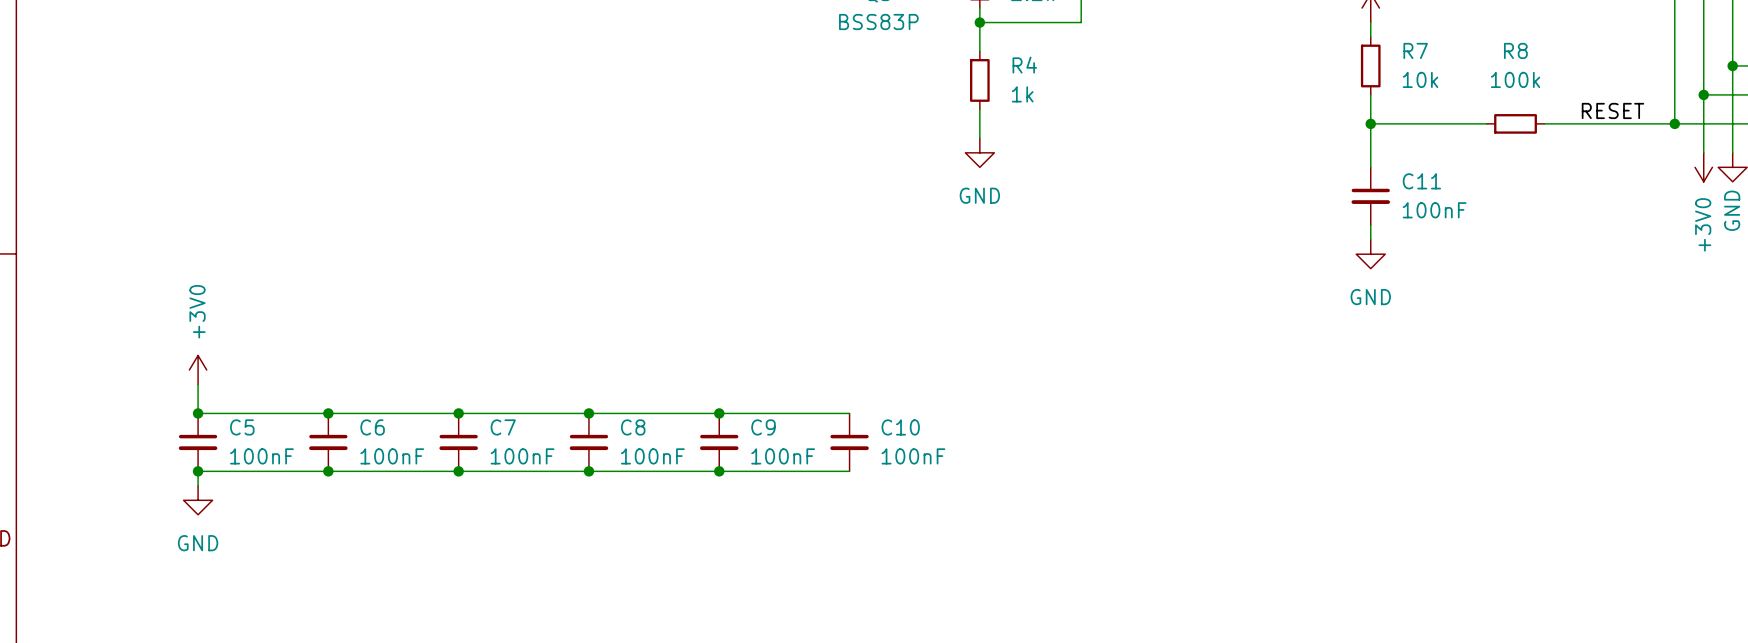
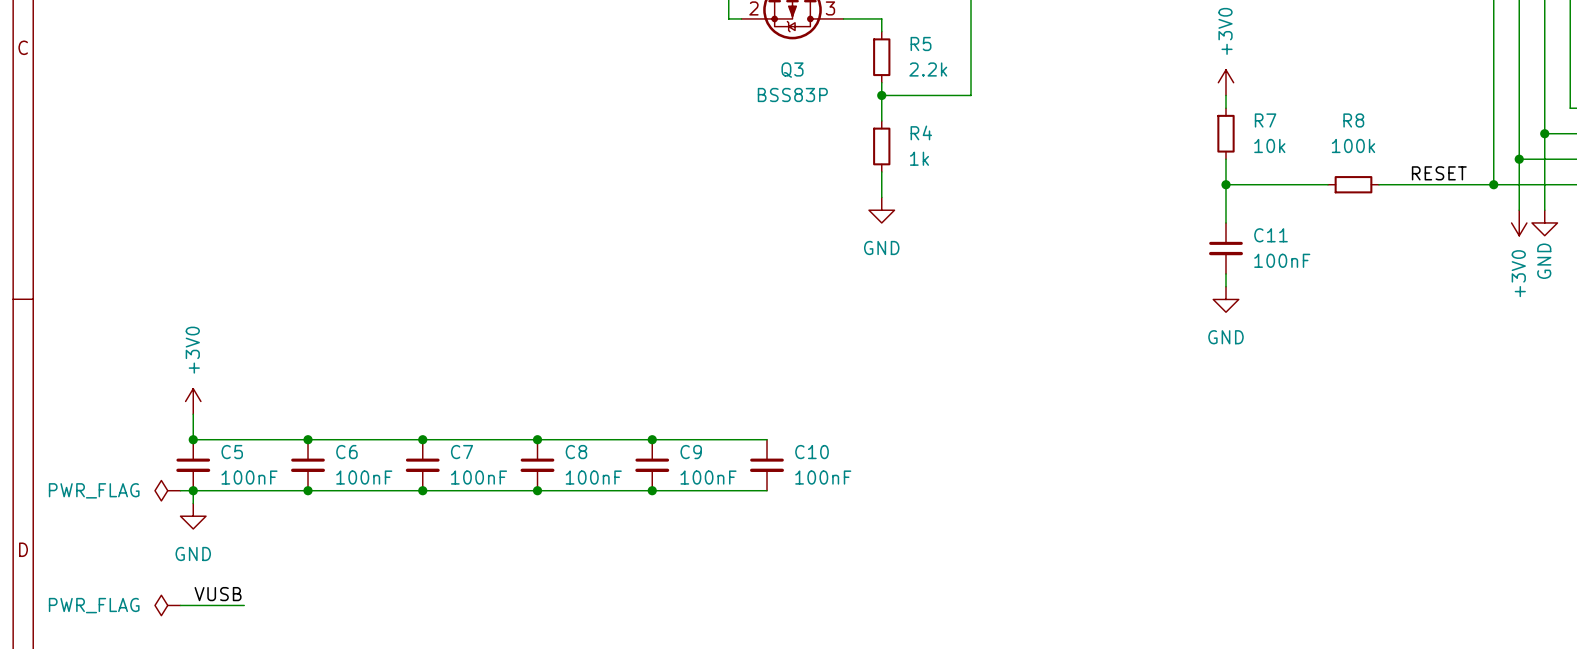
power symbol: none -> PWR_FLAG (167, 490)
wire: none -> (180, 490) (193, 490)
label: none -> VUSB (218, 594)
power symbol: none -> PWR_FLAG (167, 605)
wire: none -> (180, 605) (244, 605)

